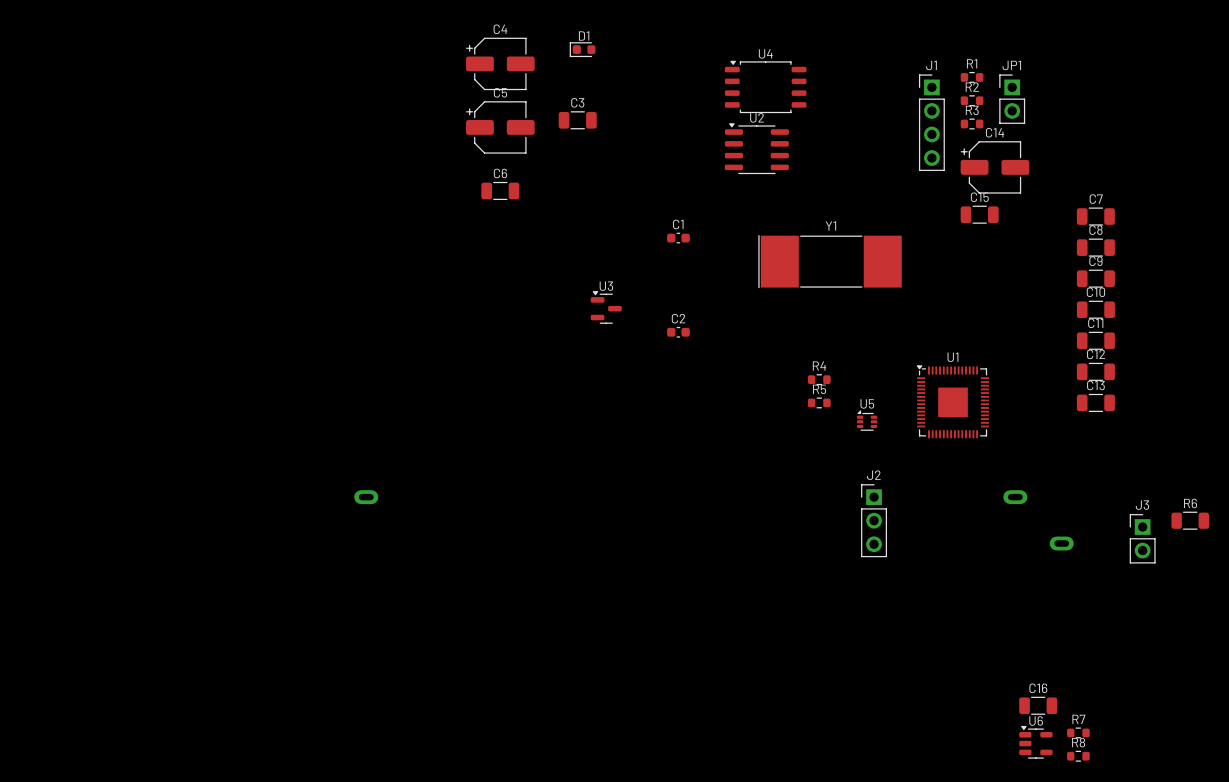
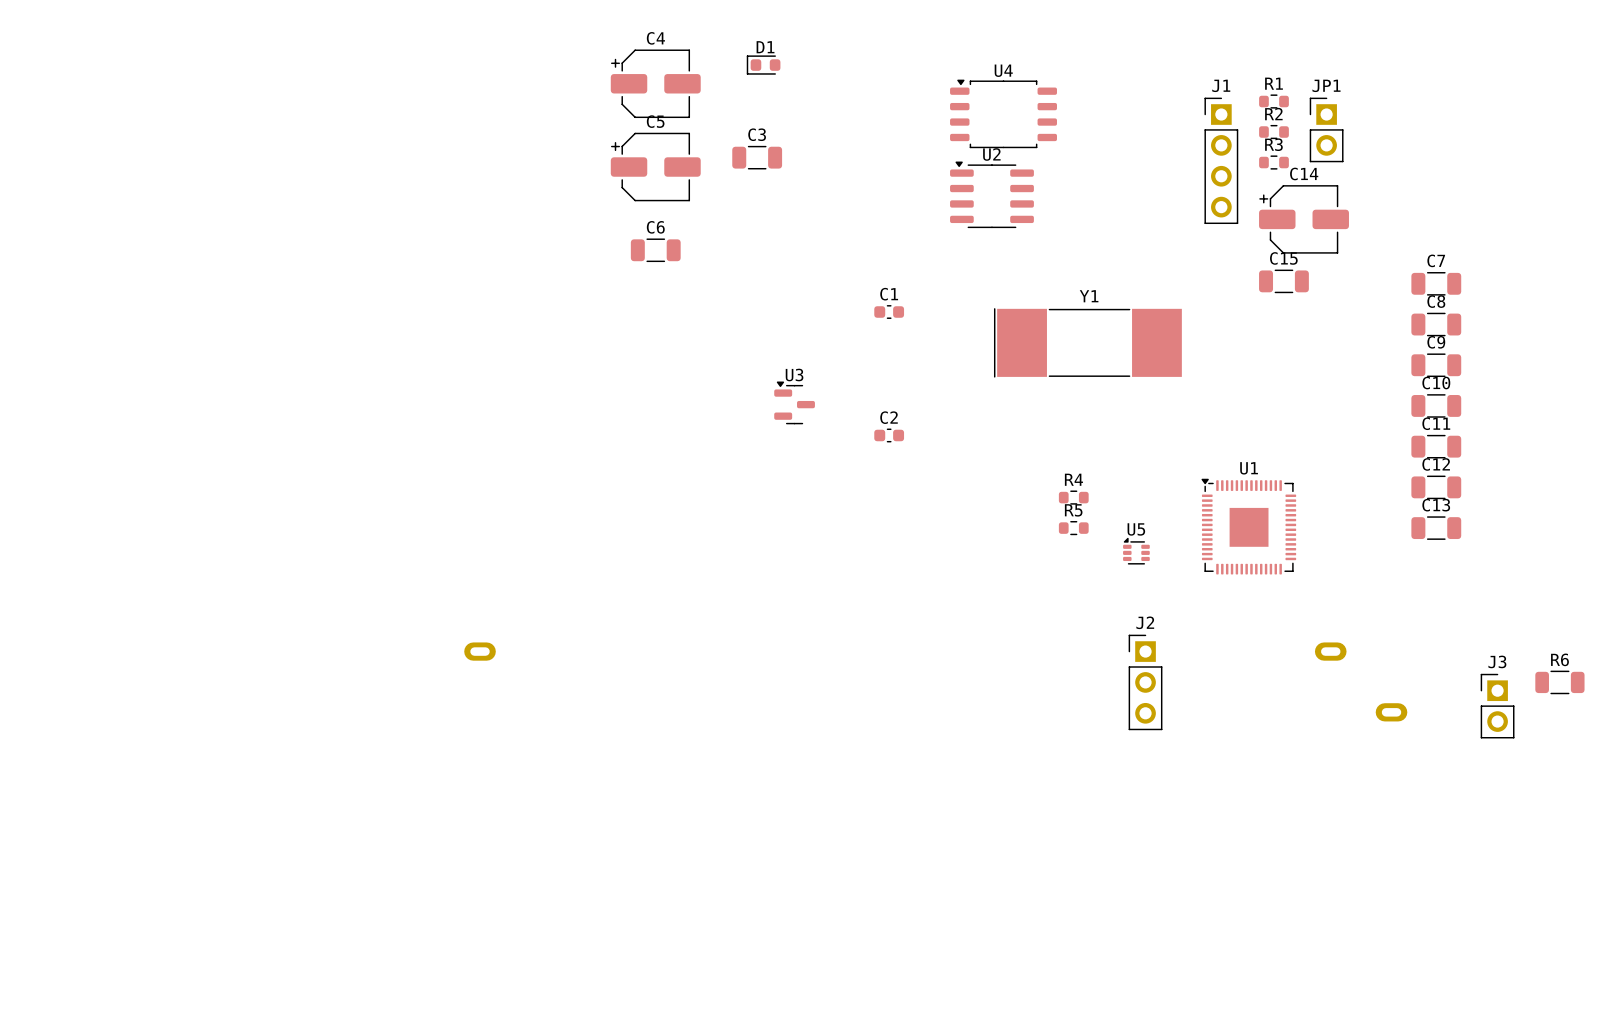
C16: (1038, 705) -> none
R7: (1078, 732) -> none
U6: (1035, 742) -> none
R8: (1078, 756) -> none

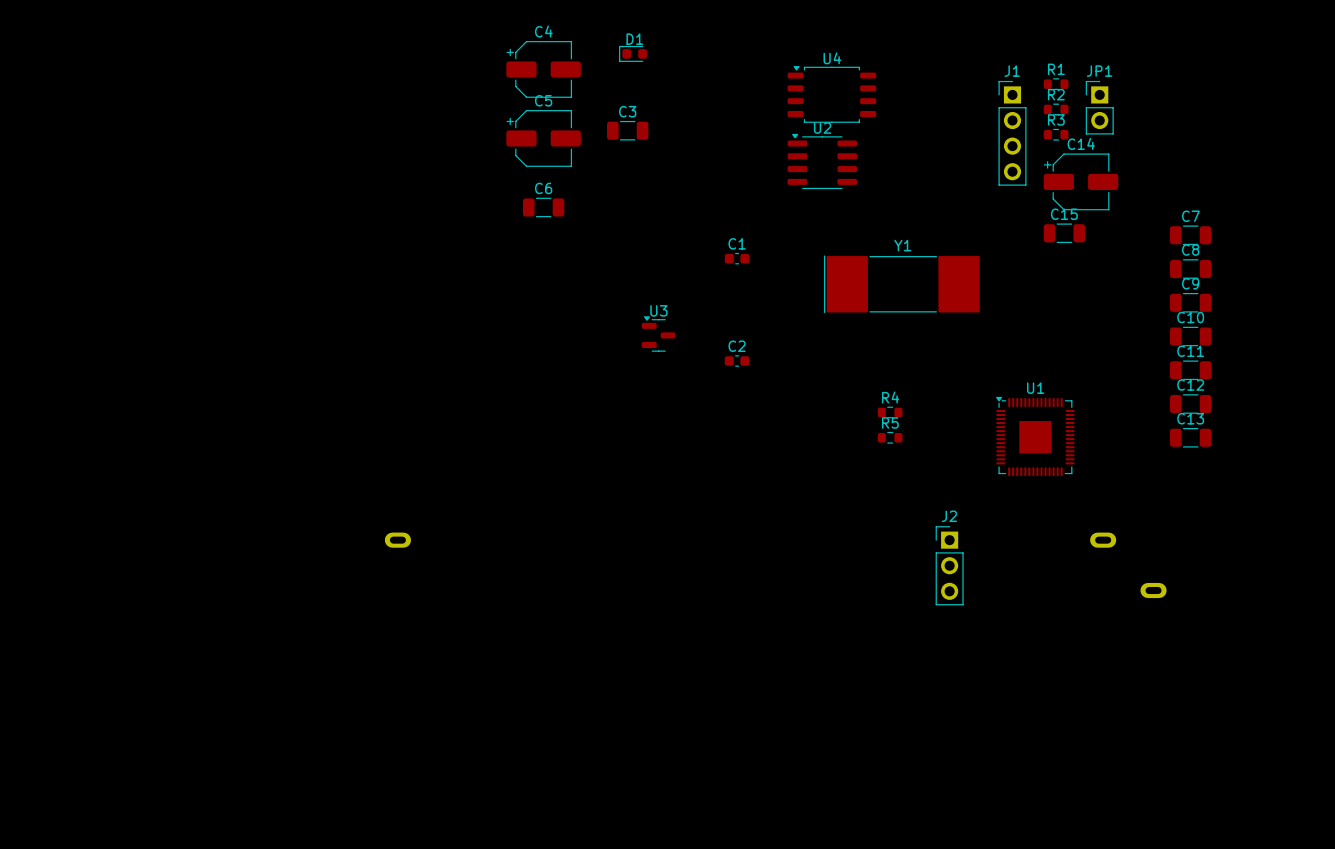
U5: (1136, 551) -> none
R6: (1559, 682) -> none
J3: (1497, 706) -> none

